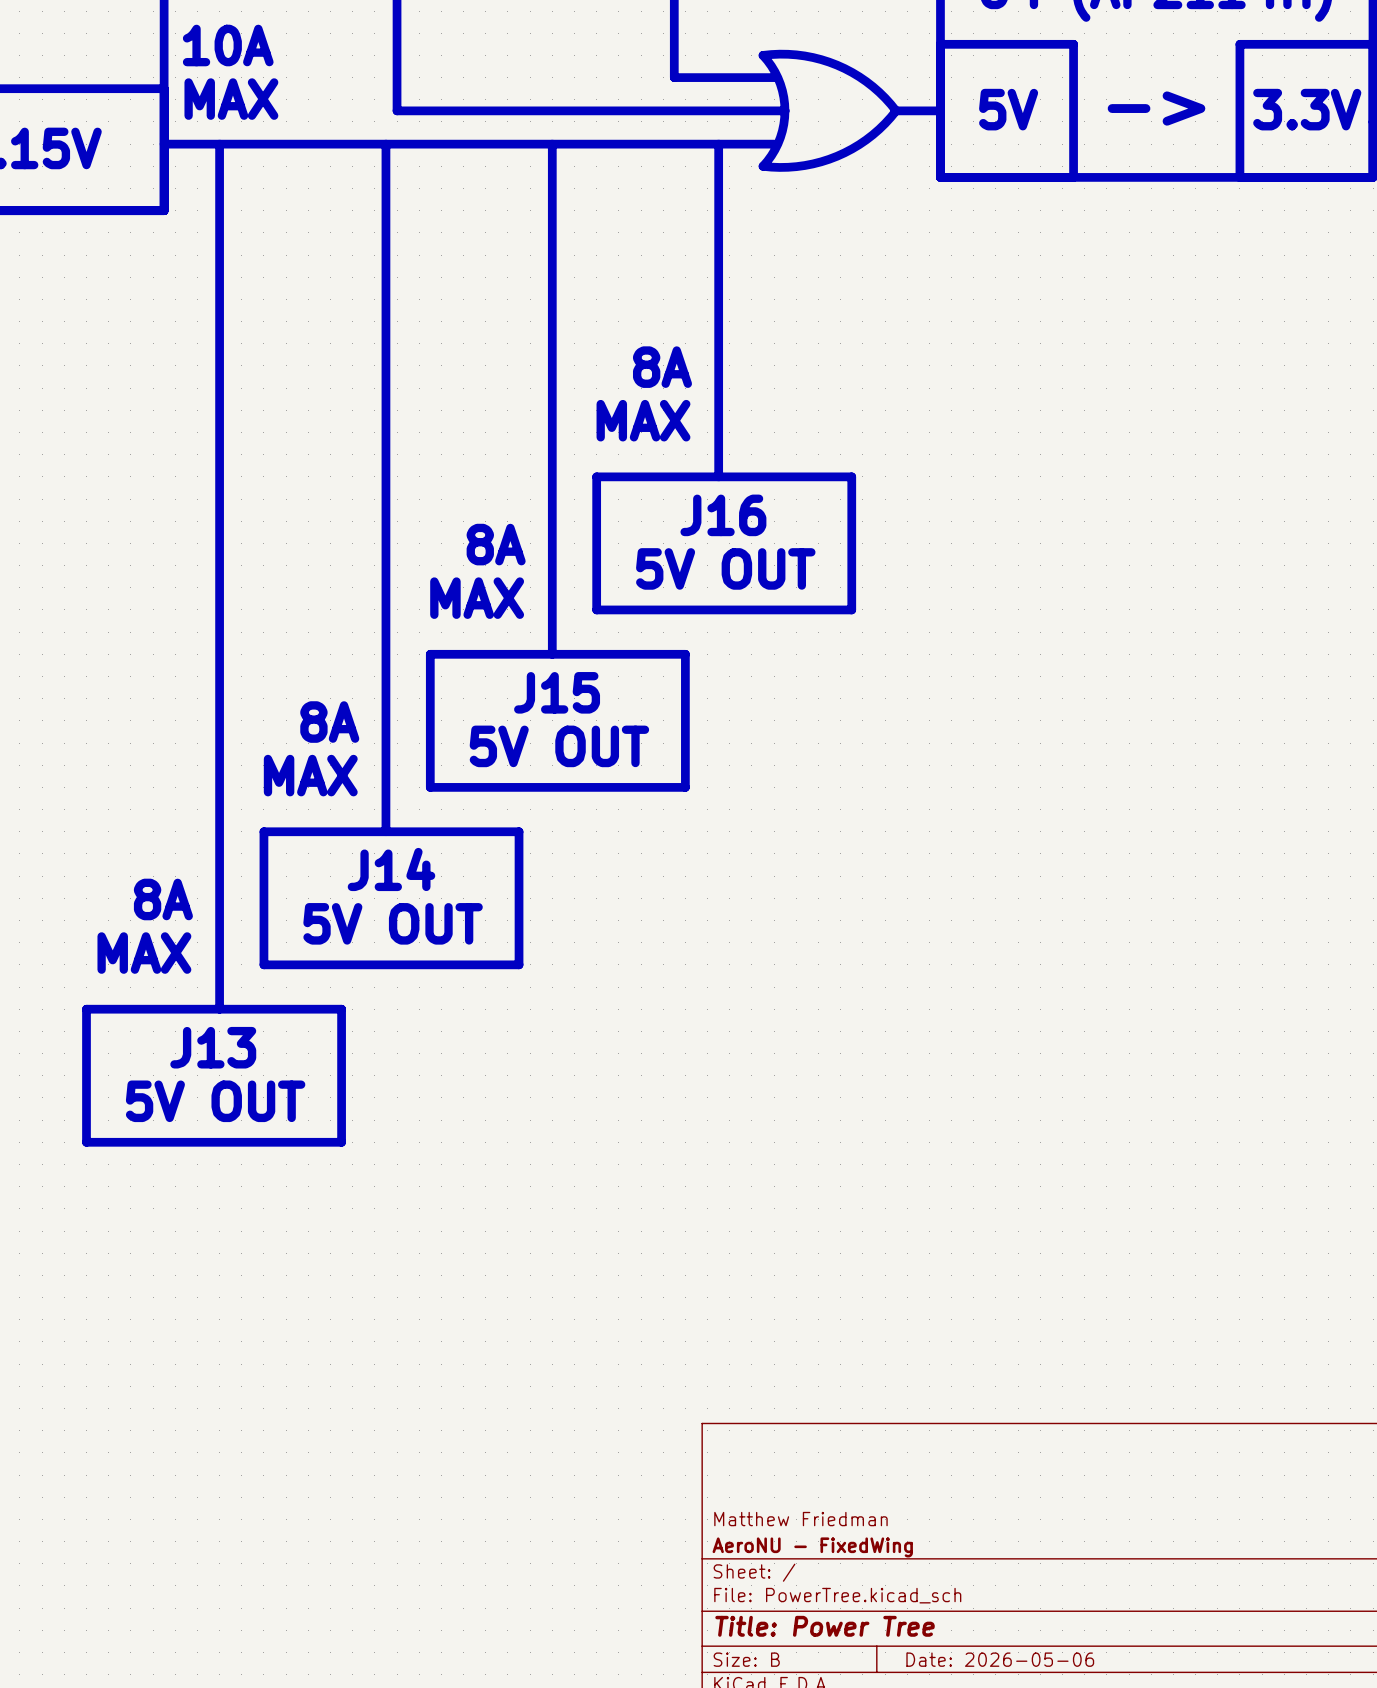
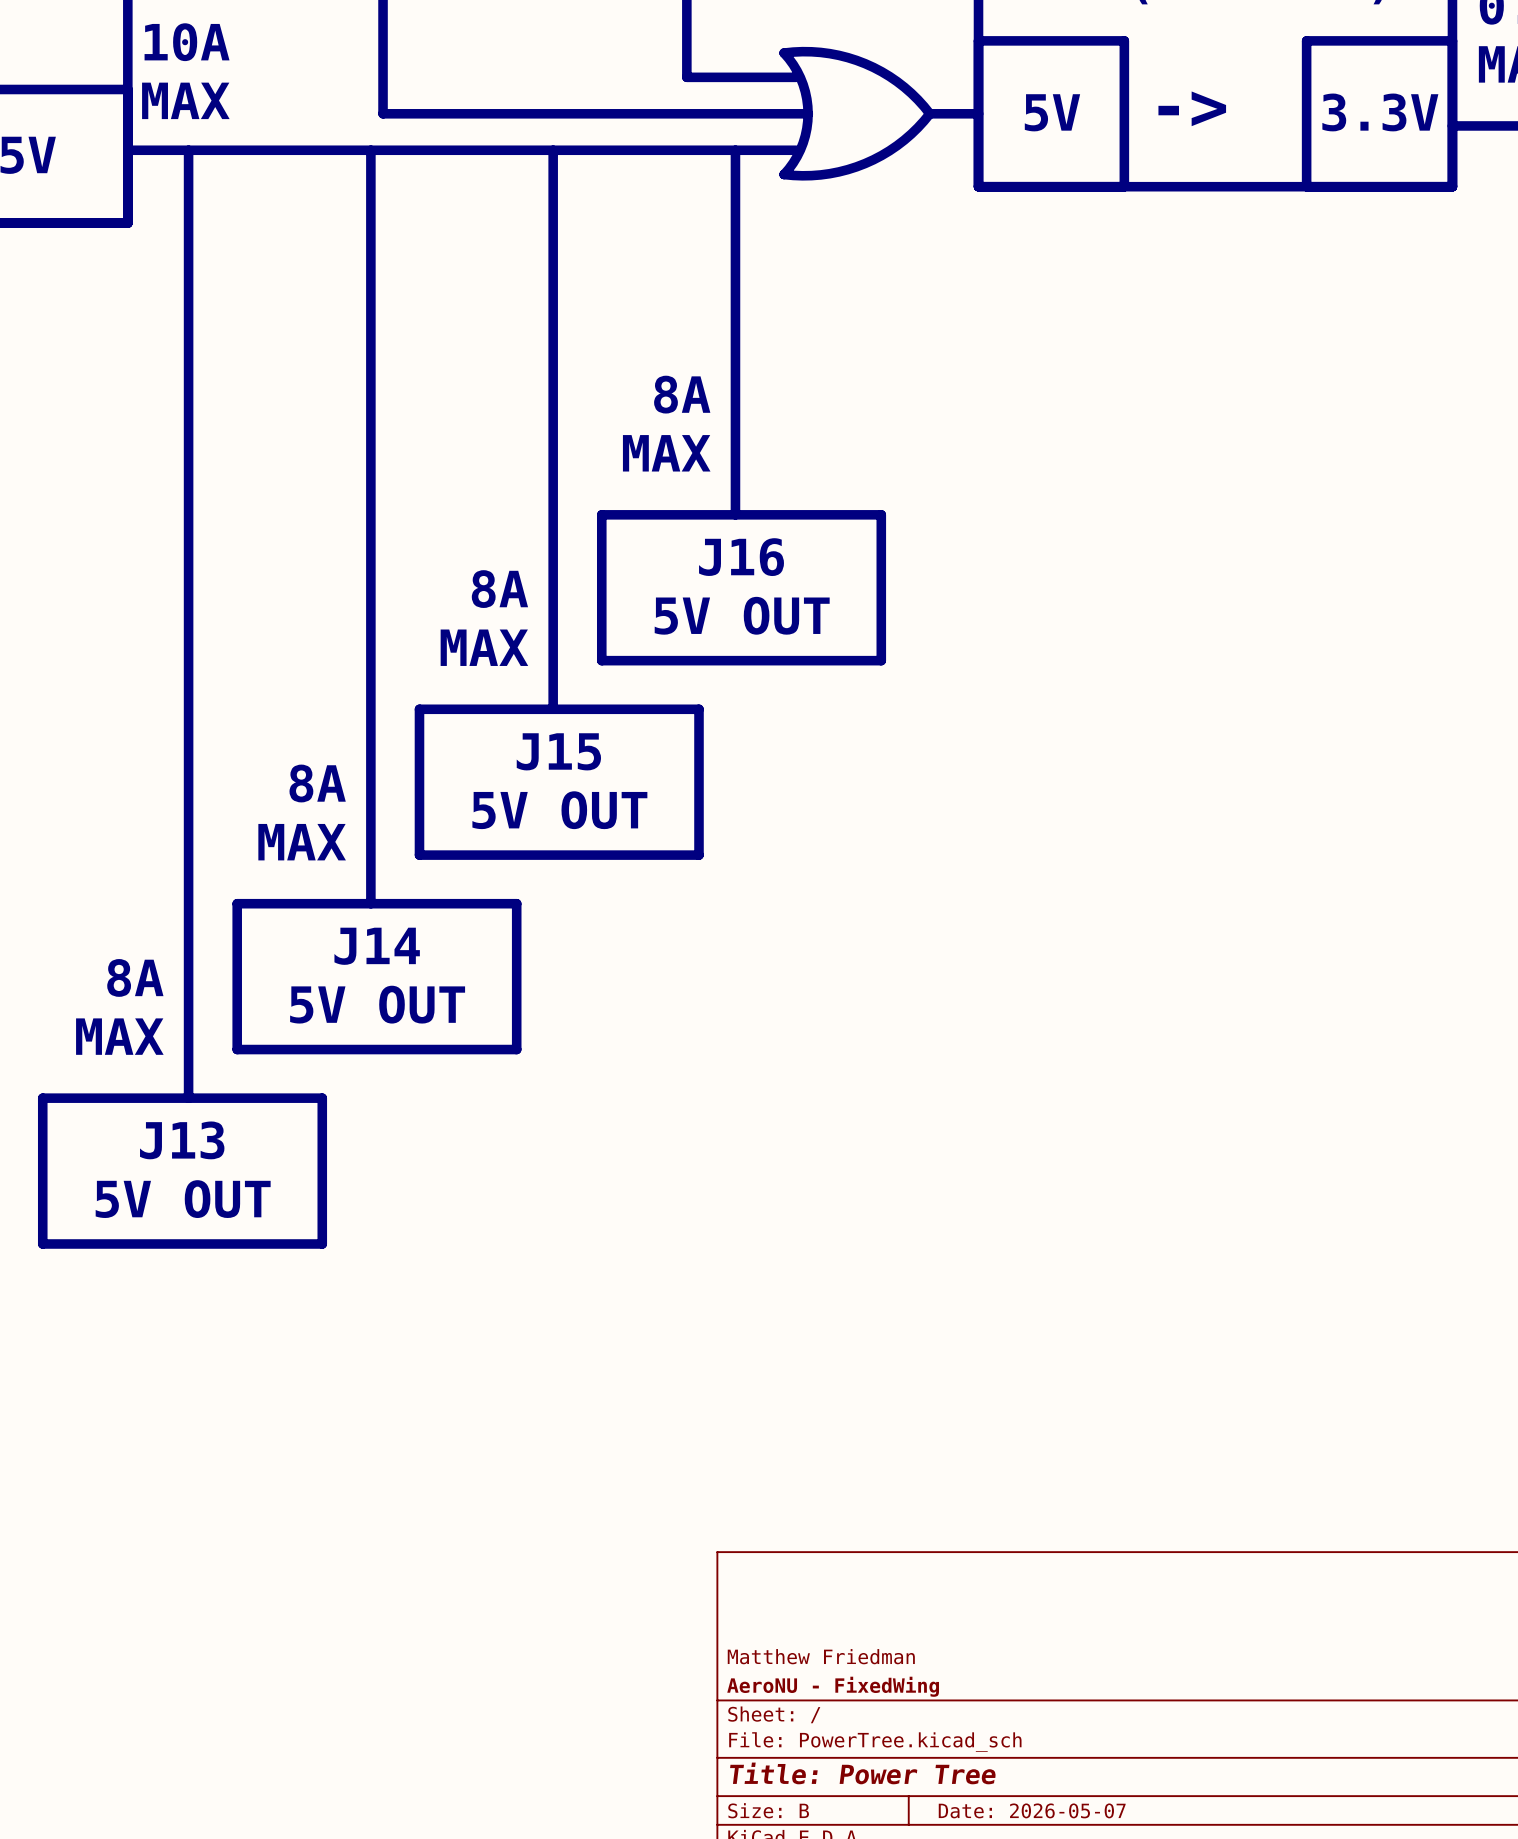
title block: Date: 2026-05-06 (1000, 1659) -> Date: 2026-05-07 (1032, 1810)

